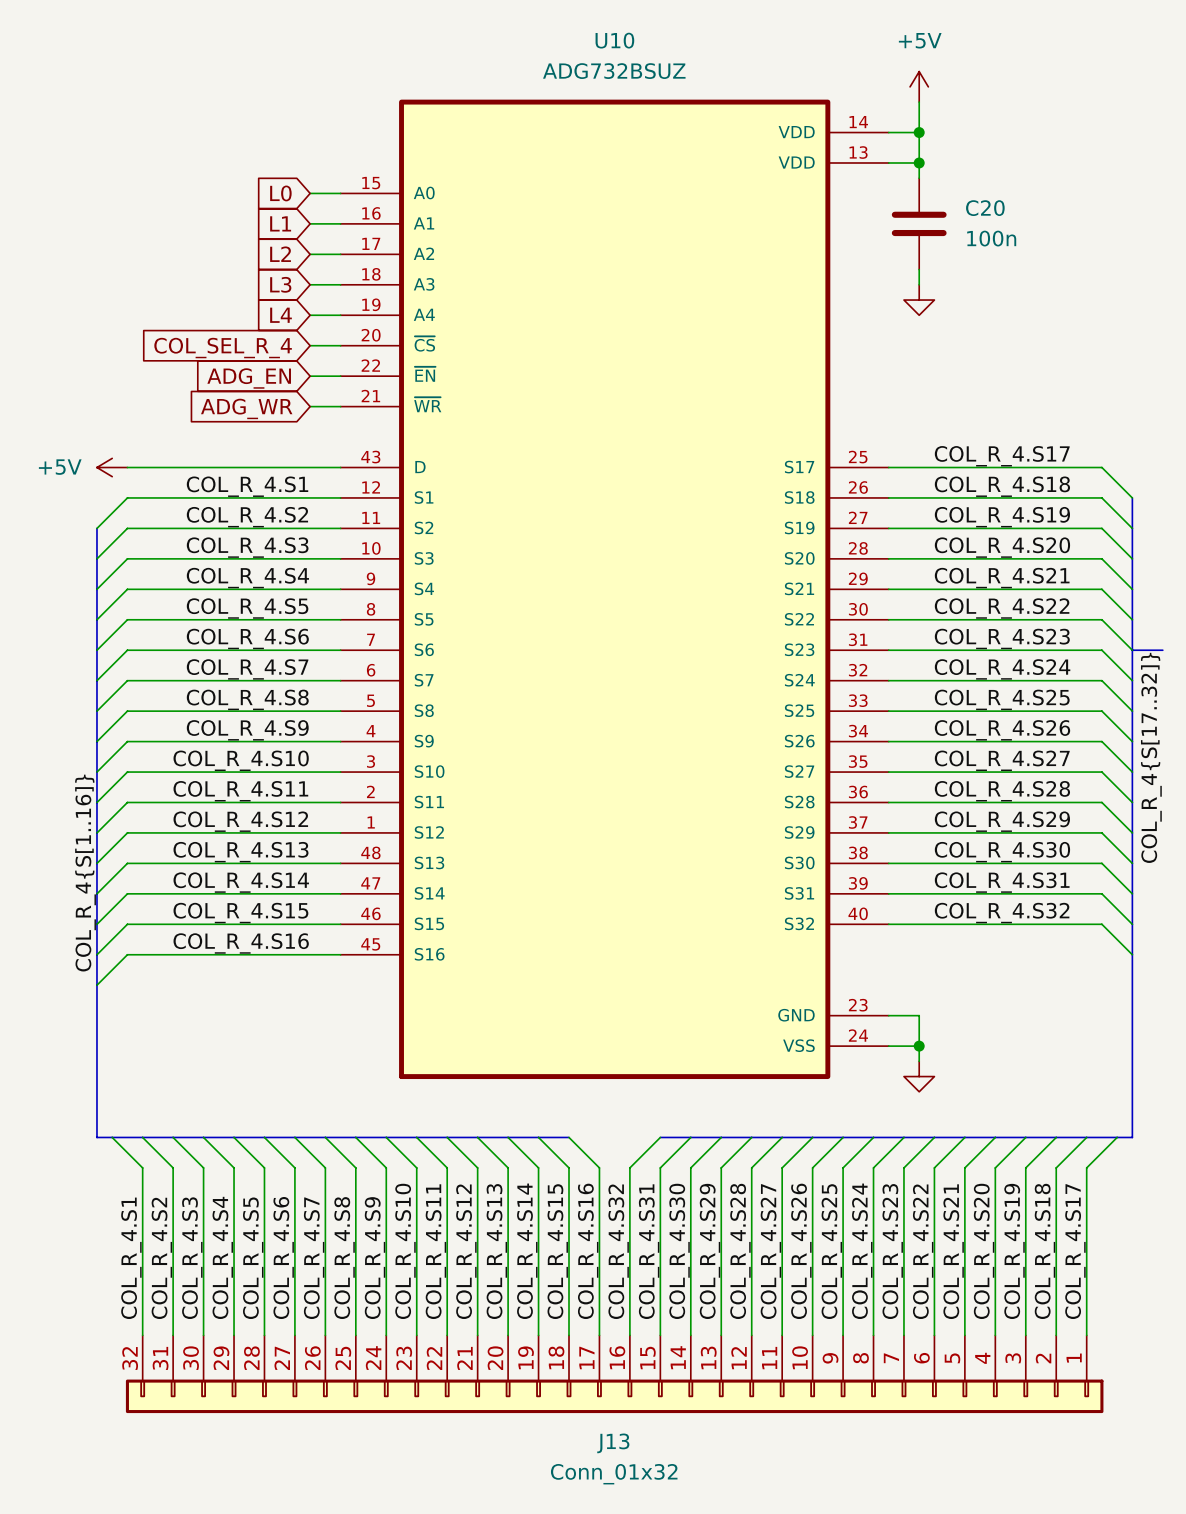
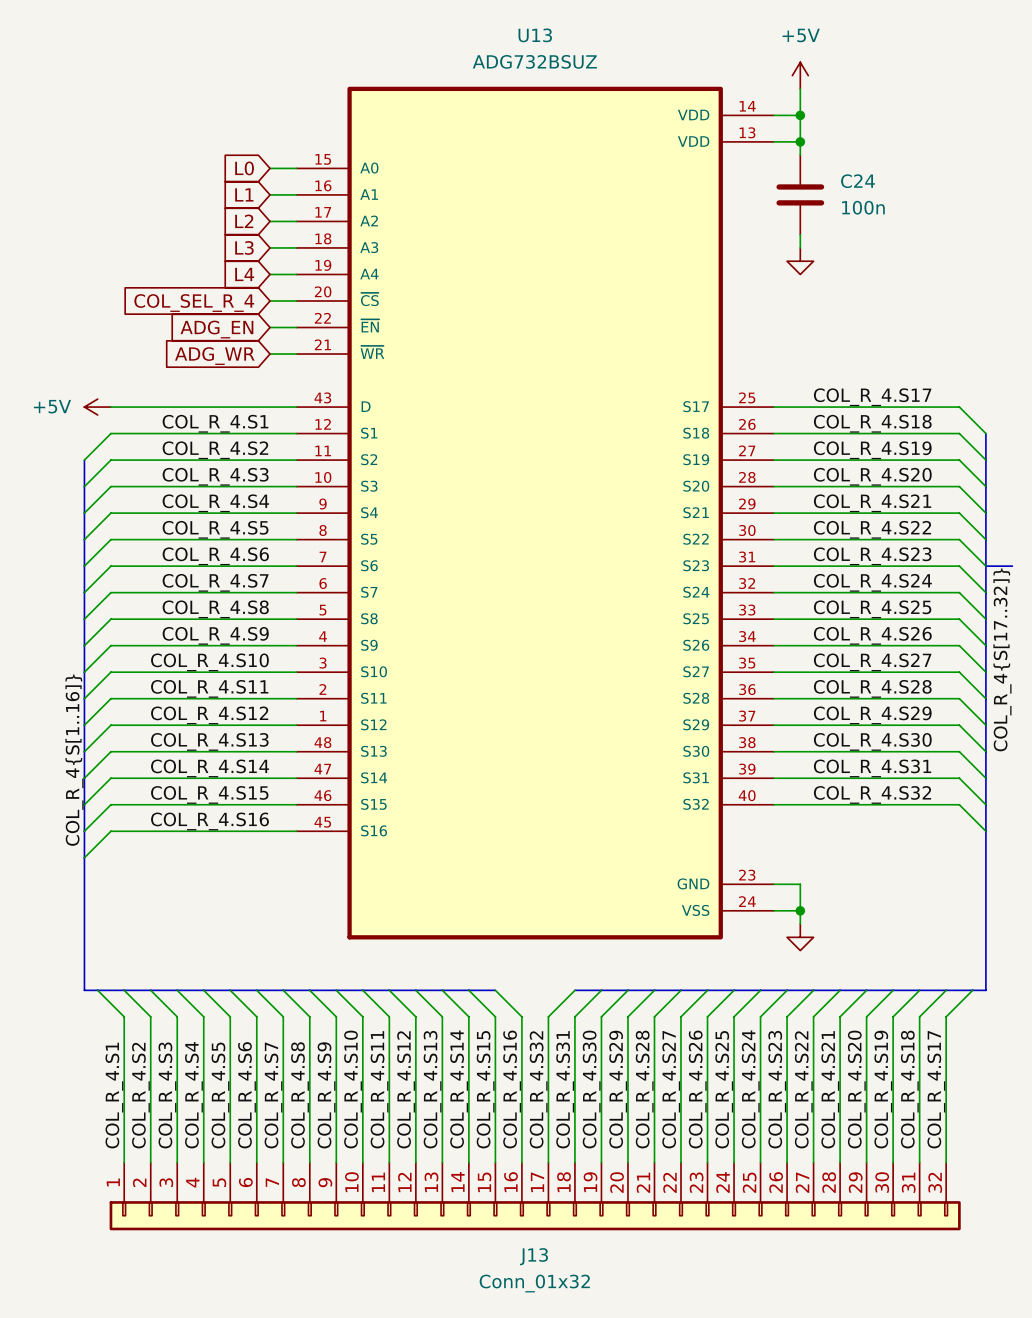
U10 name: U10 (614, 40) -> U13 (535, 35)
C20 name: C20 (985, 208) -> C24 (858, 181)
J13 flip: as is (614, 1396) -> left-right (535, 1215)

